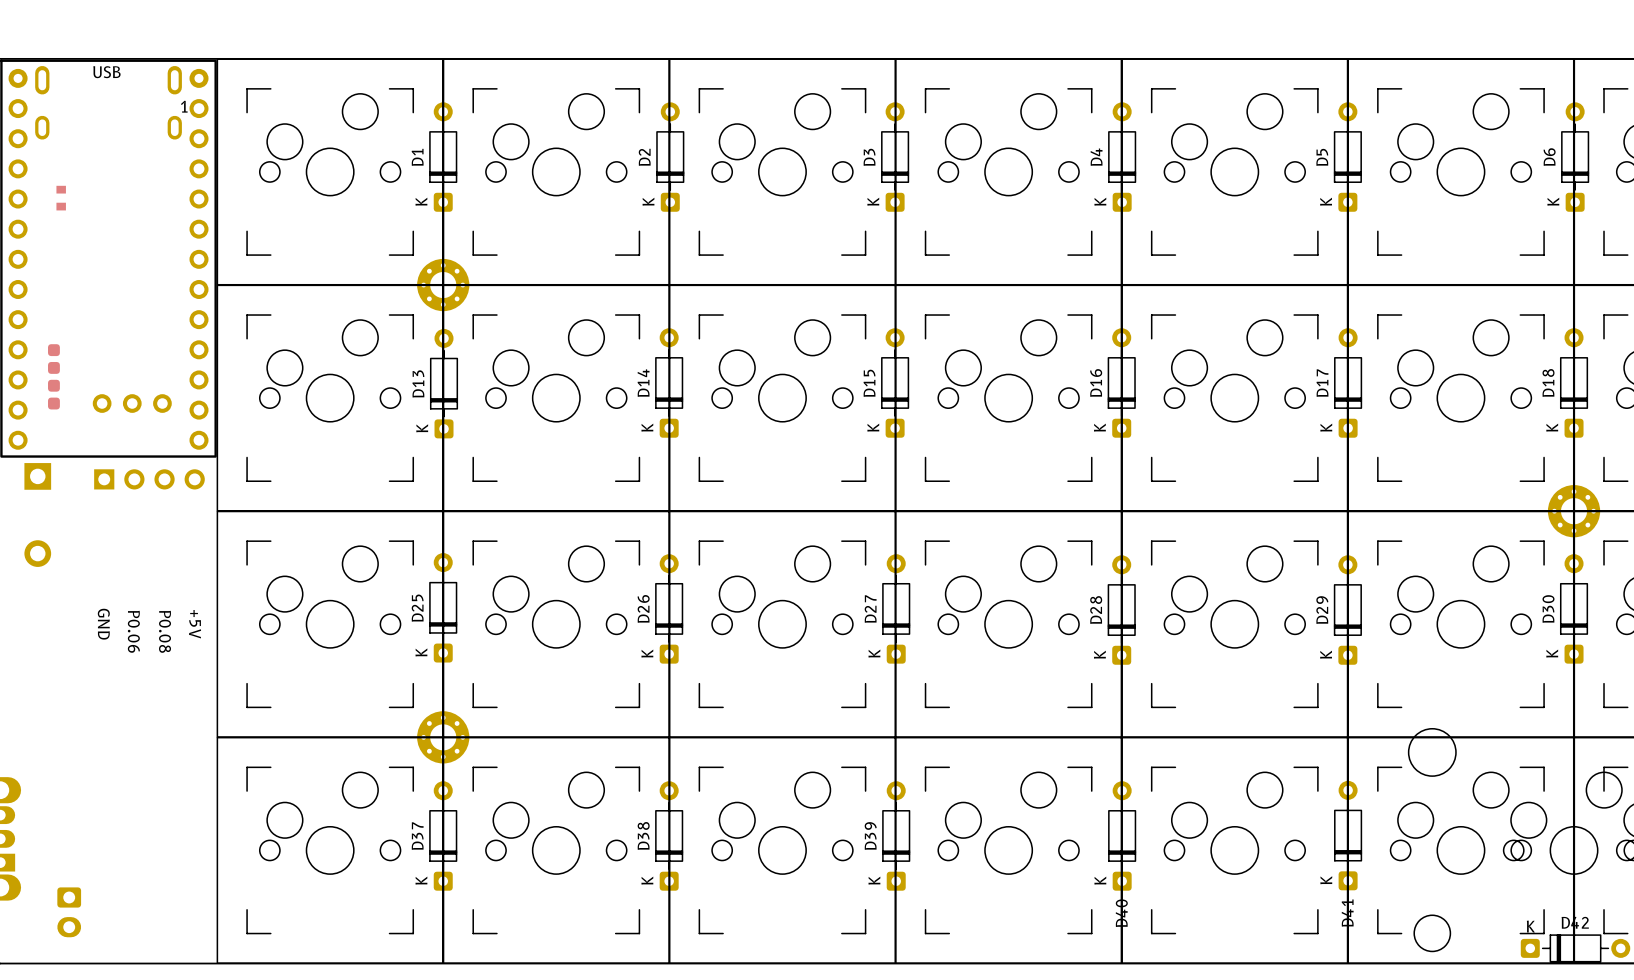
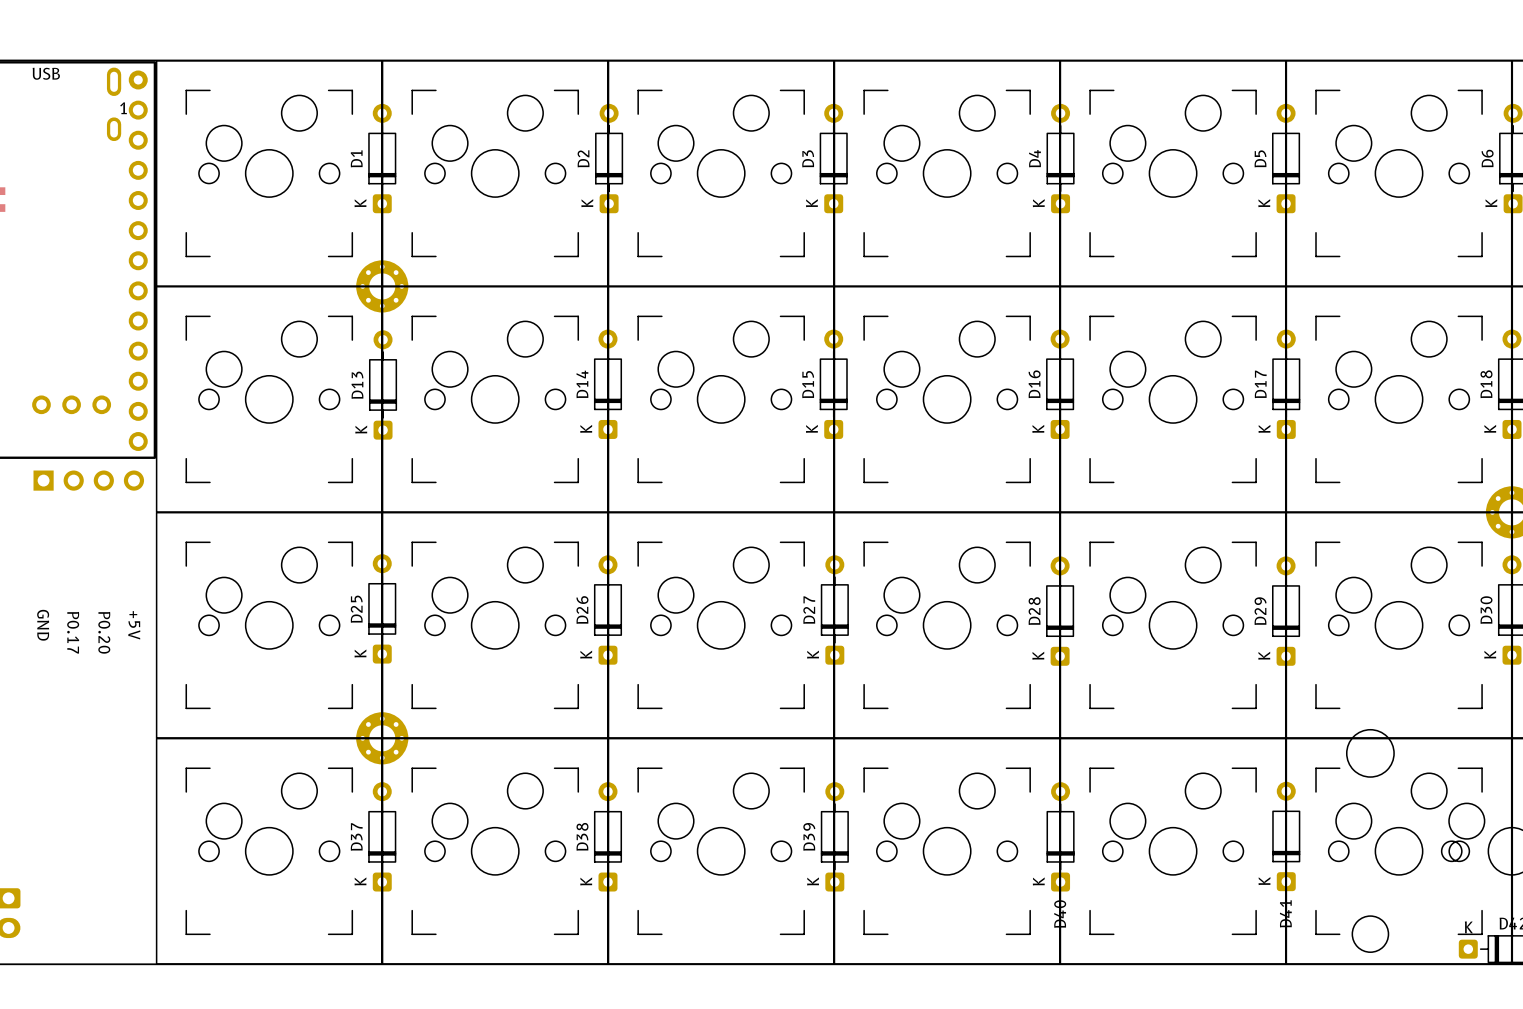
text: P0.06 (133, 631) -> P0.17 (73, 632)
text: P0.08 (165, 631) -> P0.20 (104, 632)

